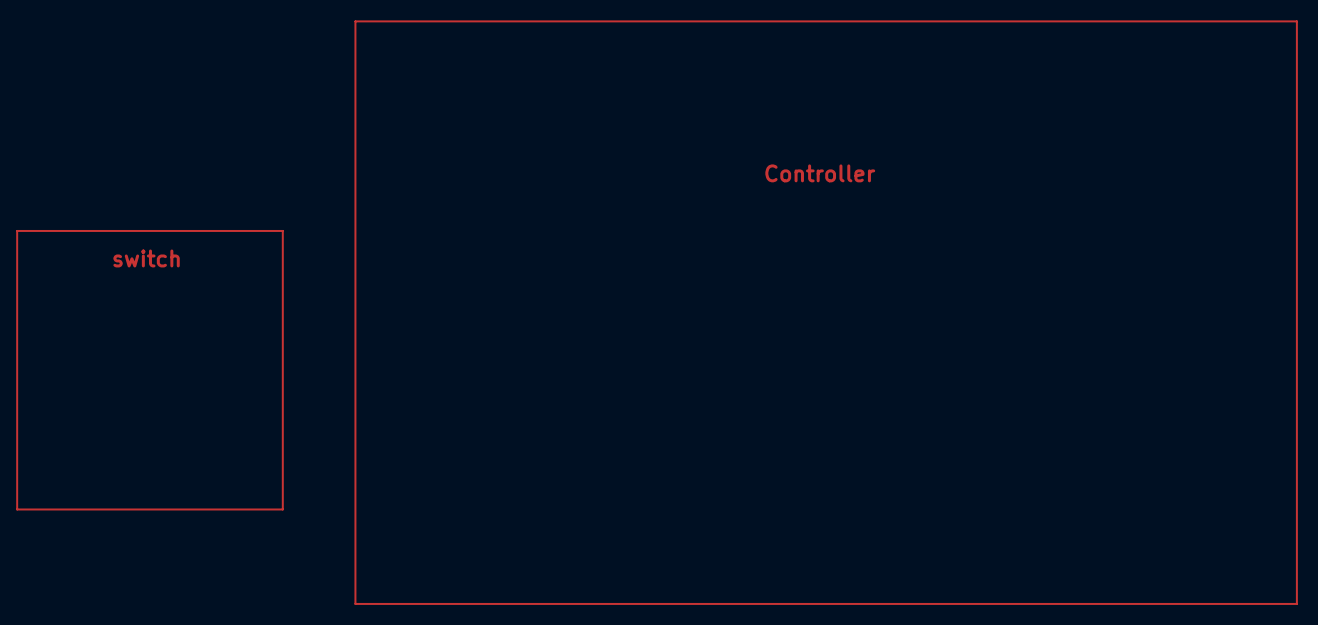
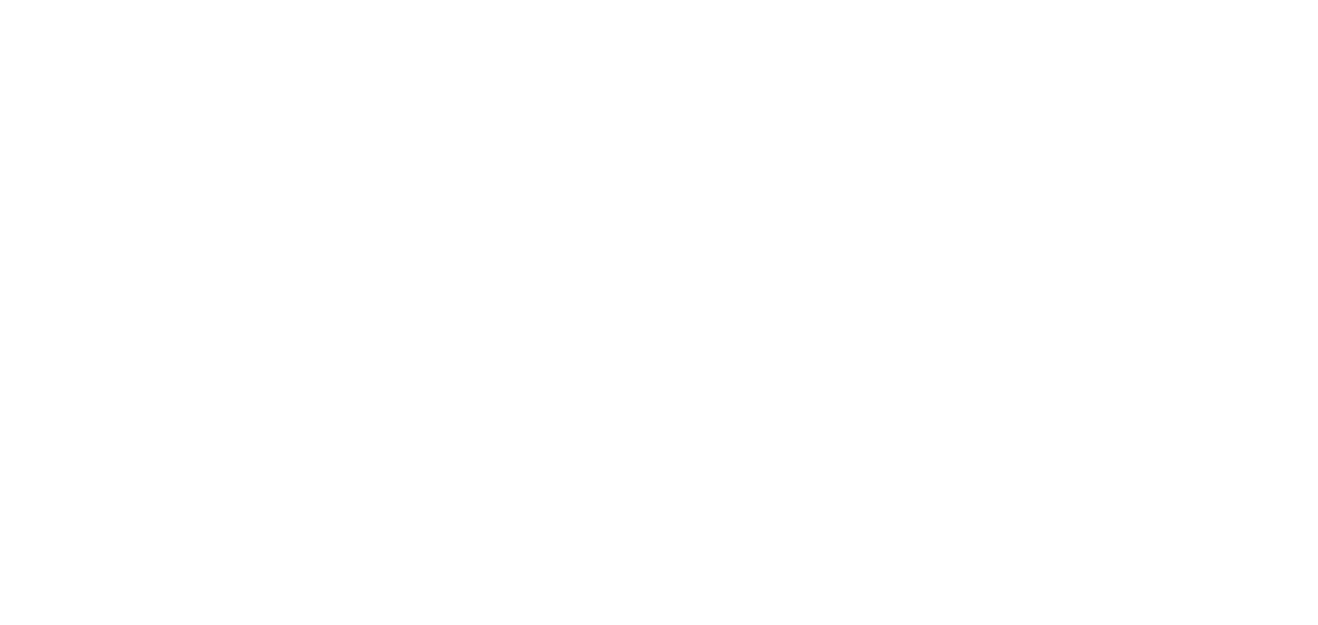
top track: (355, 21) (1296, 21) (1296, 603) (355, 603) (355, 21) -> none
text: Controller (820, 173) -> none
top track: (17, 230) (282, 230) (282, 509) (17, 509) (17, 230) -> none
text: switch (146, 258) -> none

